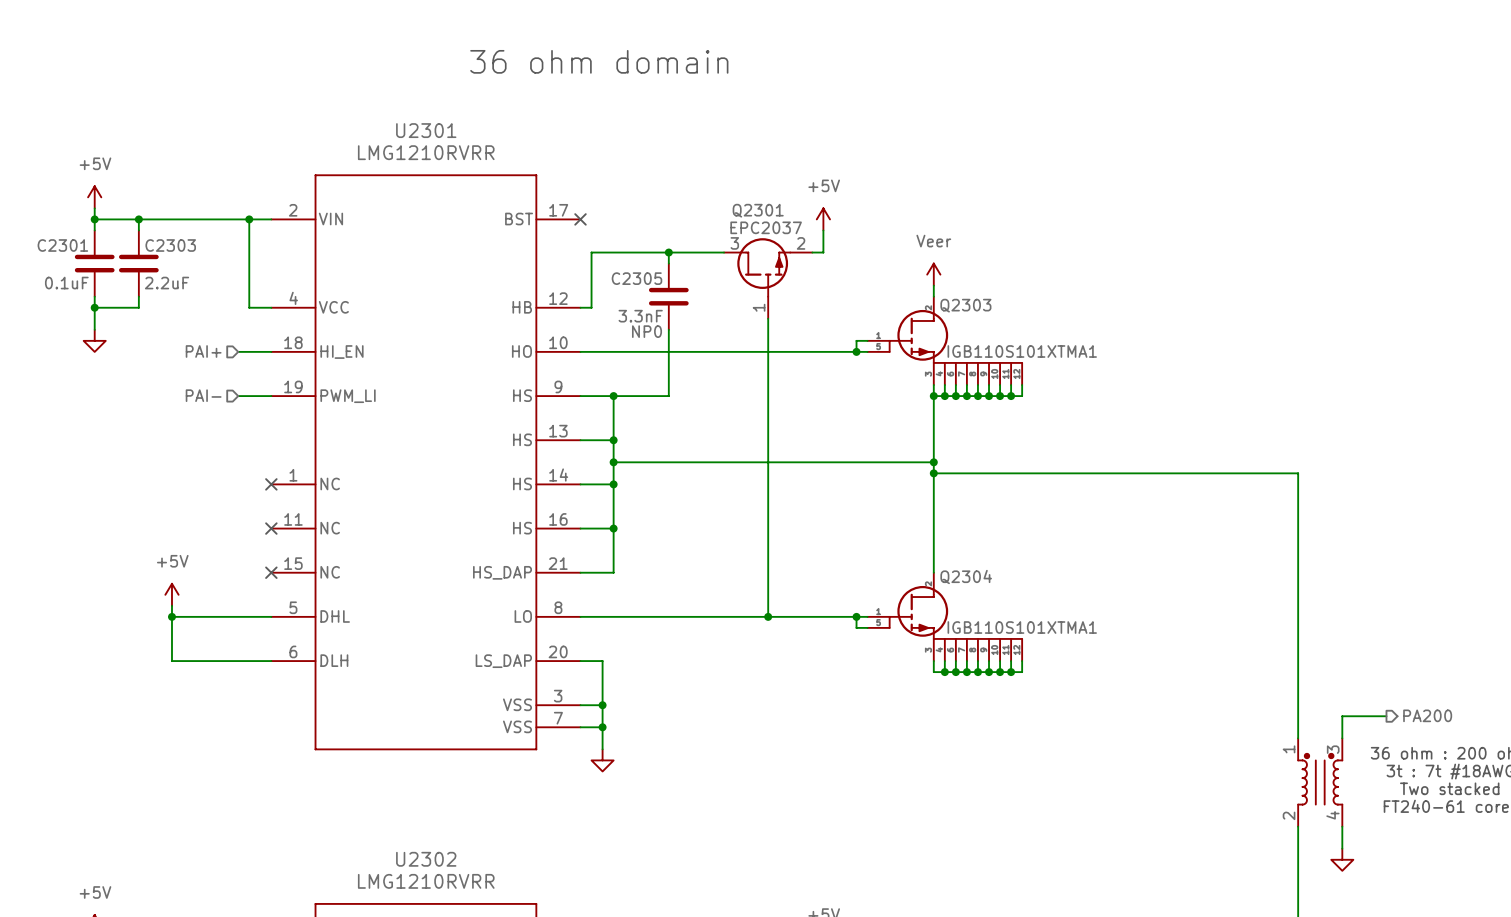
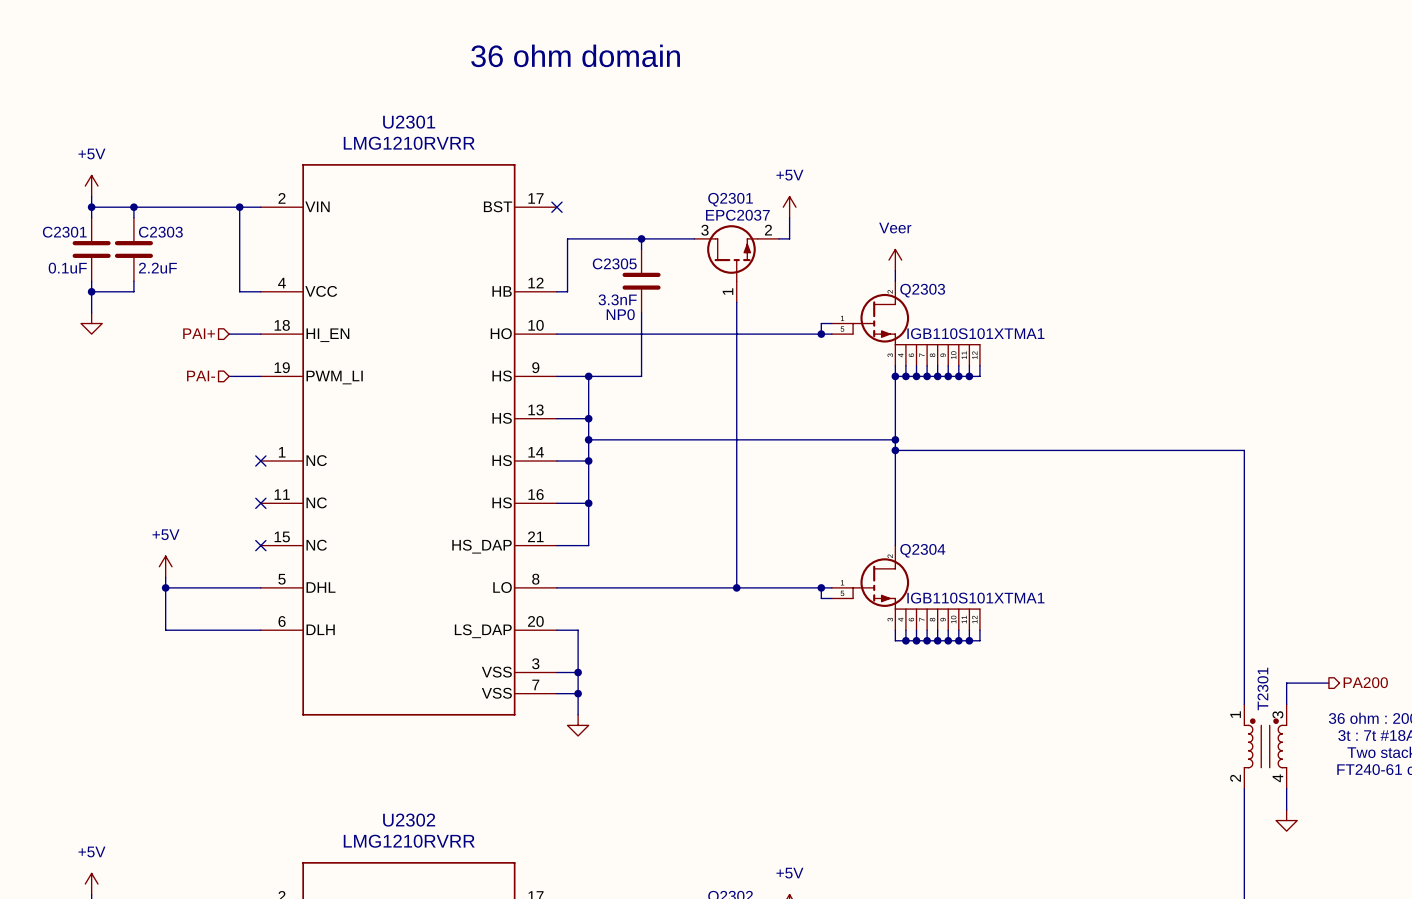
T2301 name: none -> T2301 (1262, 688)

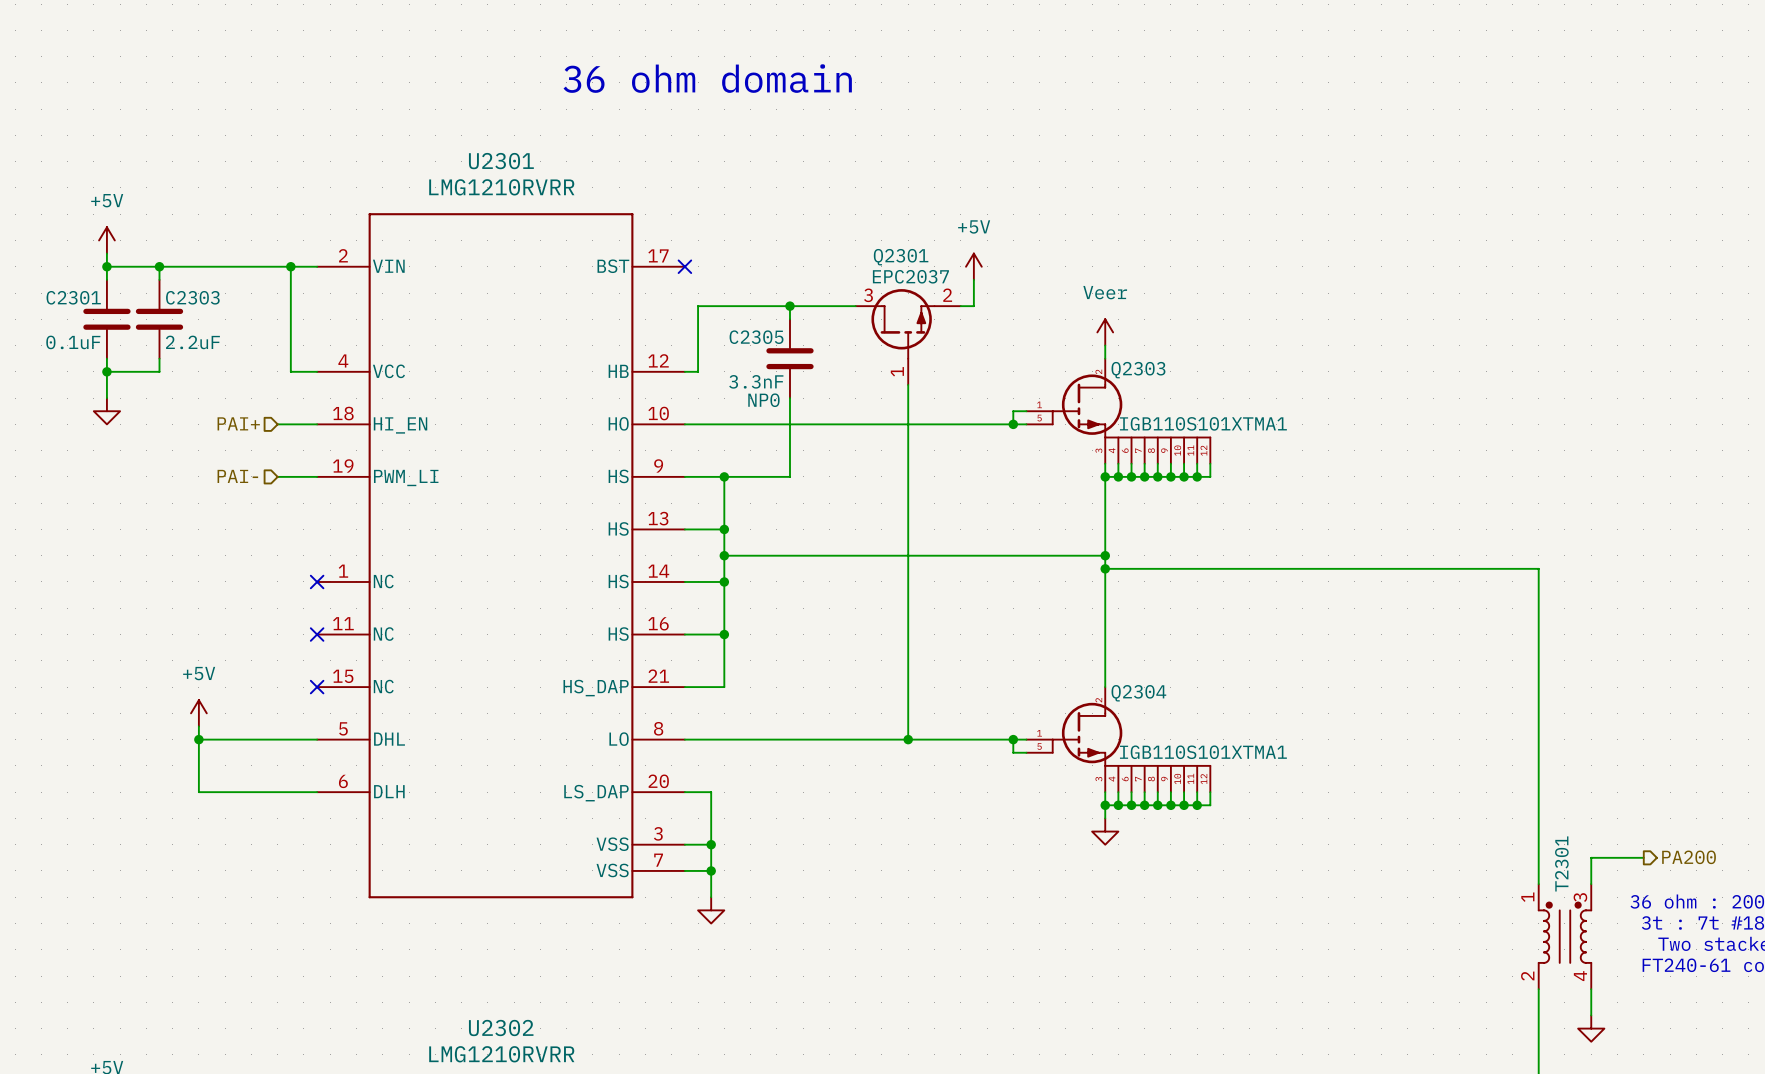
wire: none -> (1105, 805) (1105, 818)
junction: none -> (1105, 805)
power symbol: none -> (1105, 831)

